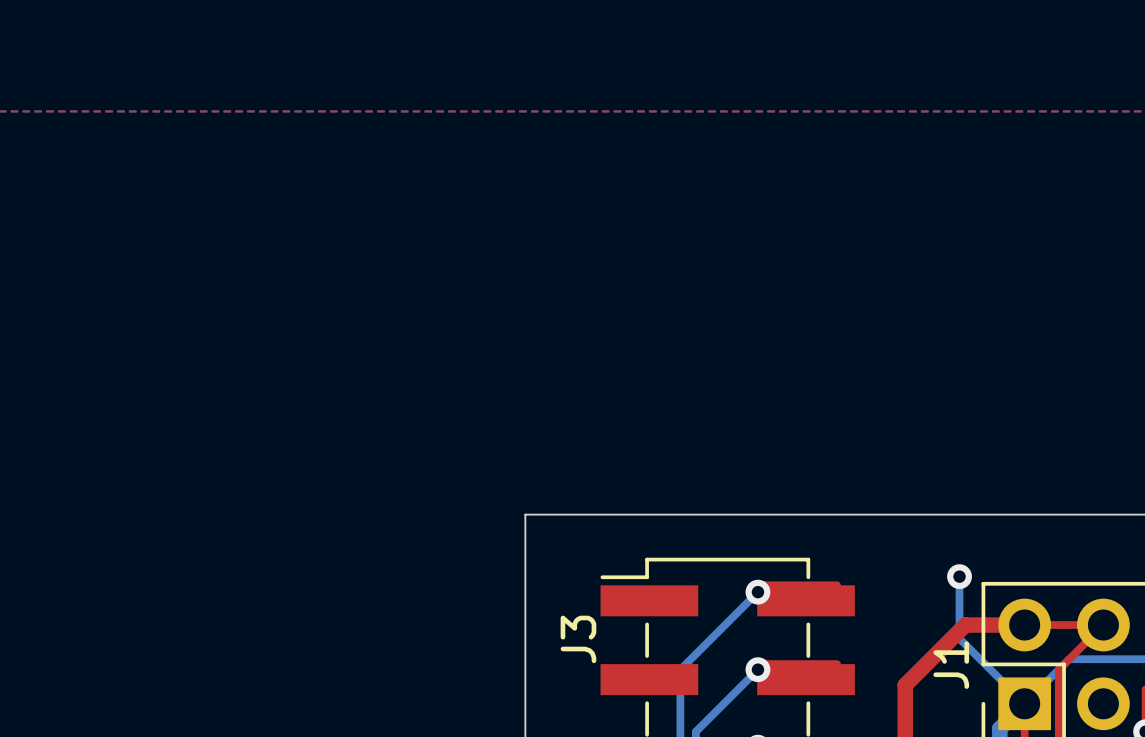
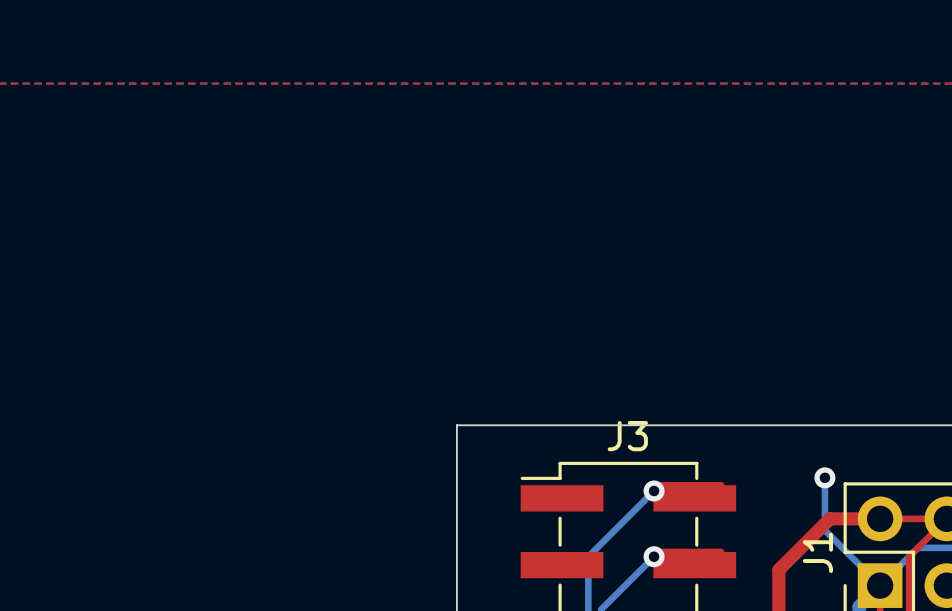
J3 name rotation: 0° (578, 639) -> 90° clockwise (627, 436)
J3 name position: J3 (578, 639) -> J3 (627, 436)

